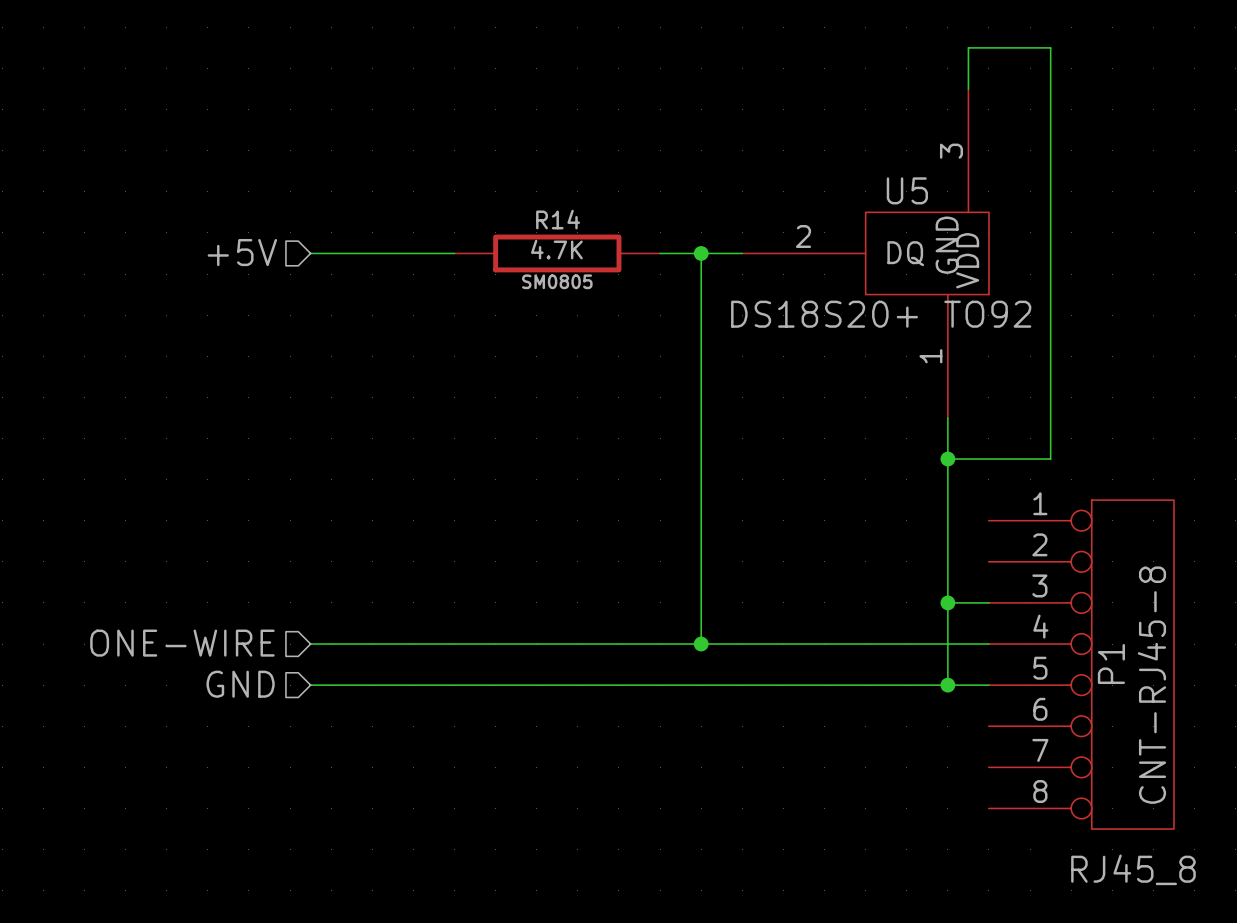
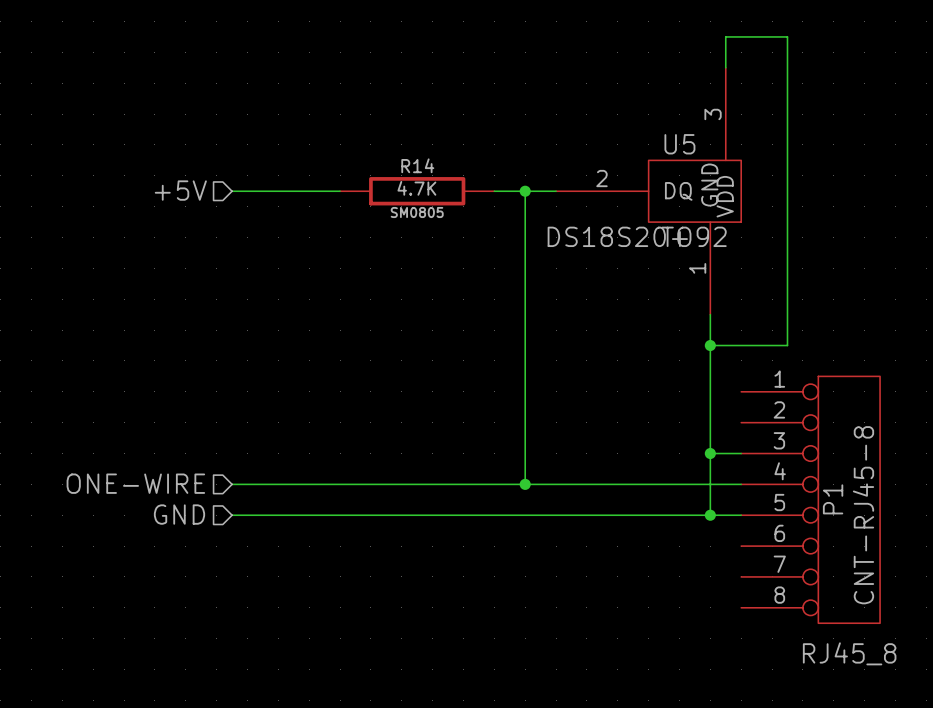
U5 text position: TO92 (987, 314) -> TO92 (694, 236)

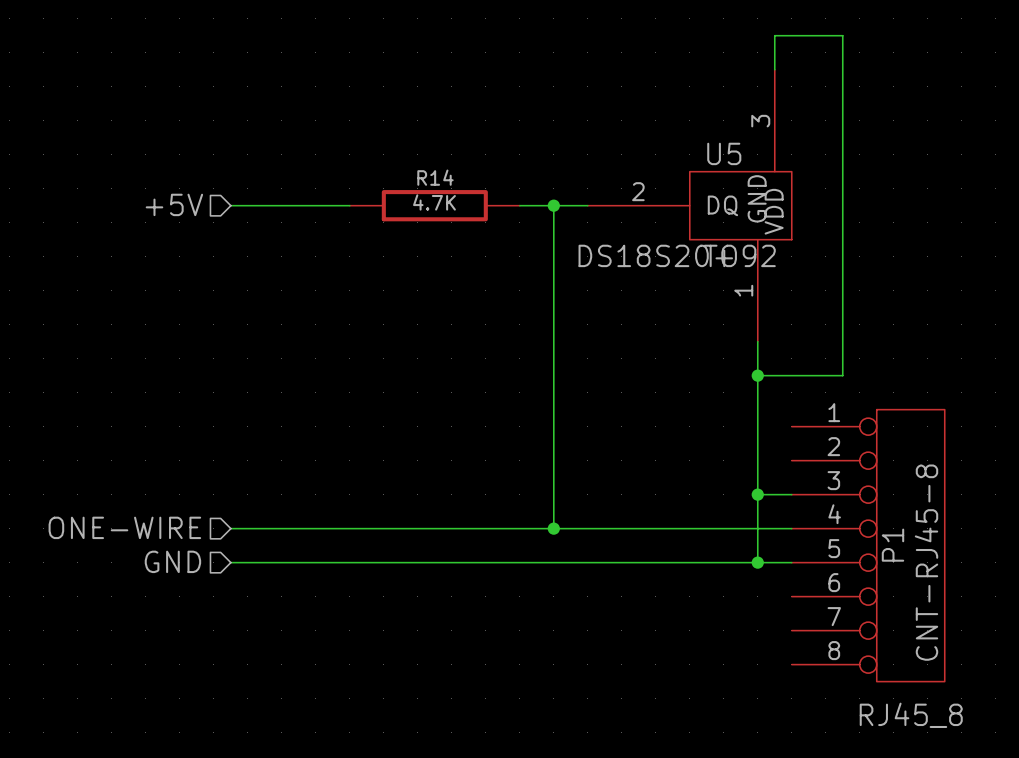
R14 text: SM0805 (417, 212) -> none

